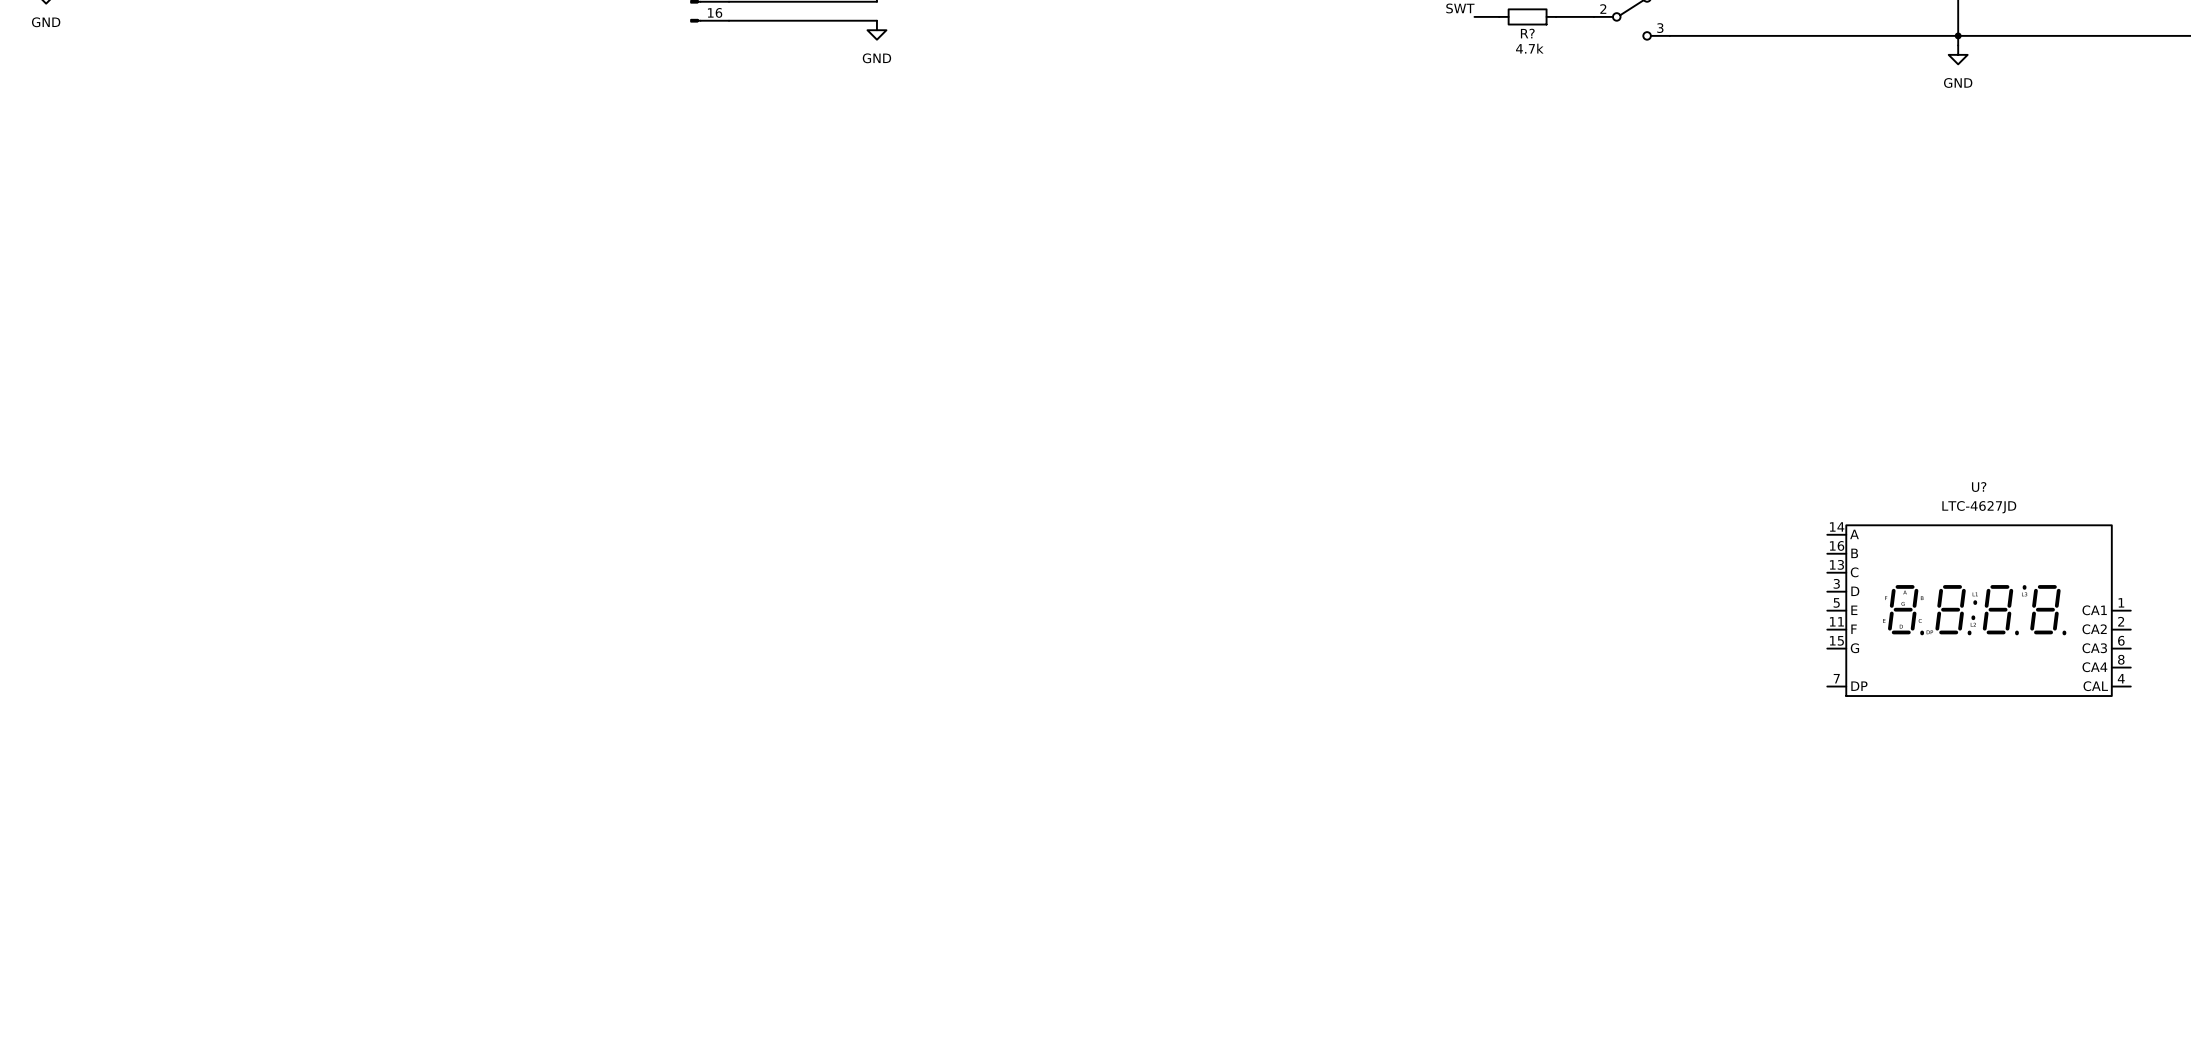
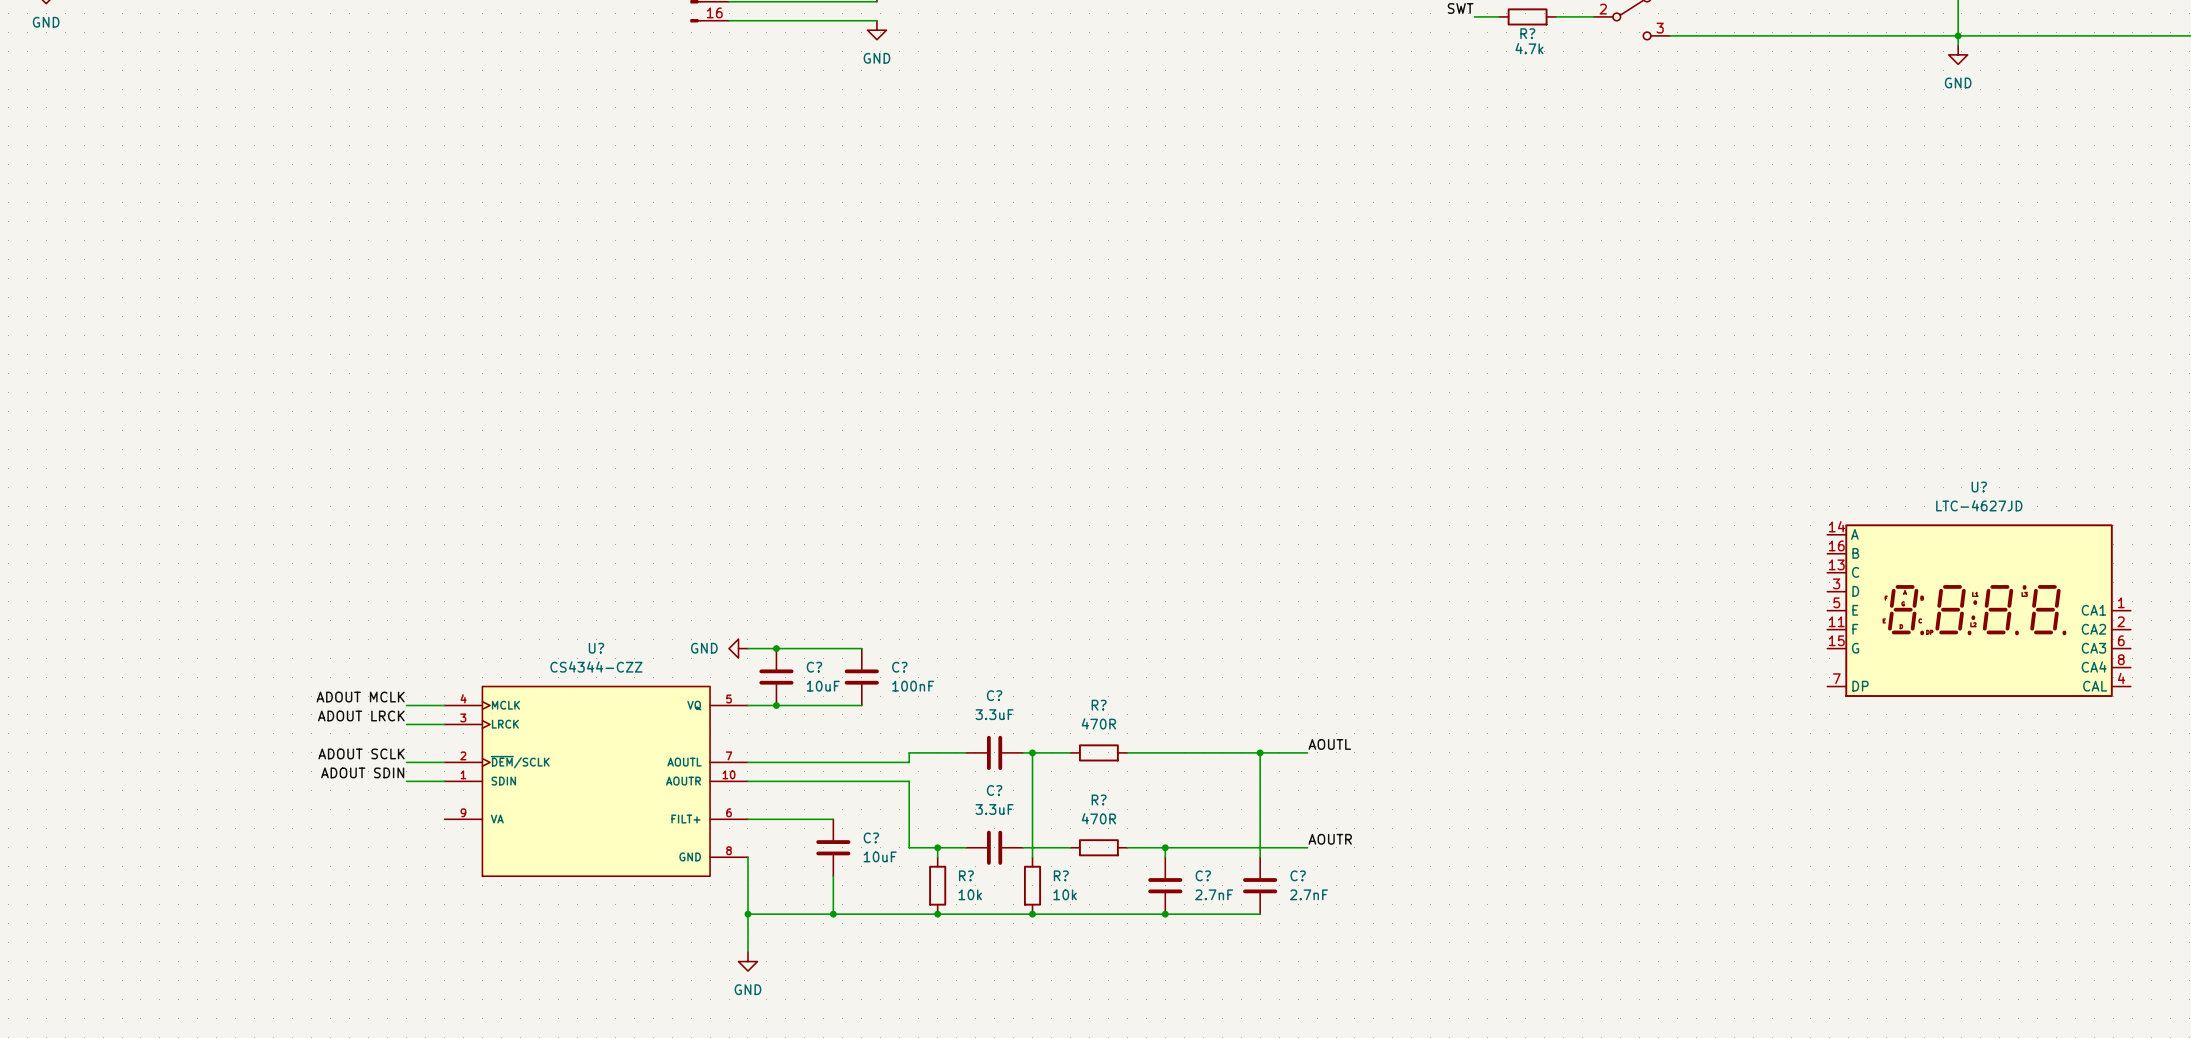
power symbol: none -> GND (738, 648)
wire: none -> (747, 648) (861, 648)
junction: none -> (776, 648)
C?: none -> 10uF (776, 677)
C?: none -> 100nF (861, 677)
label: none -> ADOUT MCLK (360, 697)
wire: none -> (406, 705) (444, 705)
wire: none -> (747, 705) (861, 705)
junction: none -> (776, 705)
label: none -> ADOUT LRCK (361, 716)
wire: none -> (406, 724) (444, 724)
label: none -> AOUTL (1329, 744)
wire: none -> (966, 752) (909, 752) (909, 762) (747, 762)
C?: none -> 3.3uF (994, 752)
wire: none -> (1023, 752) (1070, 752)
wire: none -> (1032, 752) (1032, 857)
junction: none -> (1032, 752)
R?: none -> 470R (1098, 752)
wire: none -> (1127, 752) (1307, 752)
wire: none -> (1260, 752) (1260, 857)
junction: none -> (1260, 752)
label: none -> ADOUT SCLK (361, 753)
wire: none -> (406, 762) (444, 762)
label: none -> ADOUT SDIN (362, 772)
wire: none -> (406, 781) (444, 781)
U?: none -> CS4344-CZZ (596, 781)
wire: none -> (747, 781) (909, 781) (909, 847) (966, 847)
wire: none -> (747, 819) (833, 819)
label: none -> AOUTR (1330, 839)
C?: none -> 10uF (833, 847)
wire: none -> (937, 847) (937, 857)
junction: none -> (937, 847)
C?: none -> 3.3uF (994, 847)
wire: none -> (1023, 847) (1070, 847)
R?: none -> 470R (1098, 847)
wire: none -> (1127, 847) (1307, 847)
wire: none -> (1165, 847) (1165, 857)
junction: none -> (1165, 847)
wire: none -> (747, 857) (747, 952)
wire: none -> (833, 876) (833, 914)
R?: none -> 10k (937, 885)
R?: none -> 10k (1032, 885)
C?: none -> 2.7nF (1165, 885)
C?: none -> 2.7nF (1260, 885)
wire: none -> (747, 914) (1260, 914)
junction: none -> (747, 914)
junction: none -> (833, 914)
junction: none -> (937, 914)
junction: none -> (1032, 914)
junction: none -> (1165, 914)
power symbol: none -> GND (747, 961)

